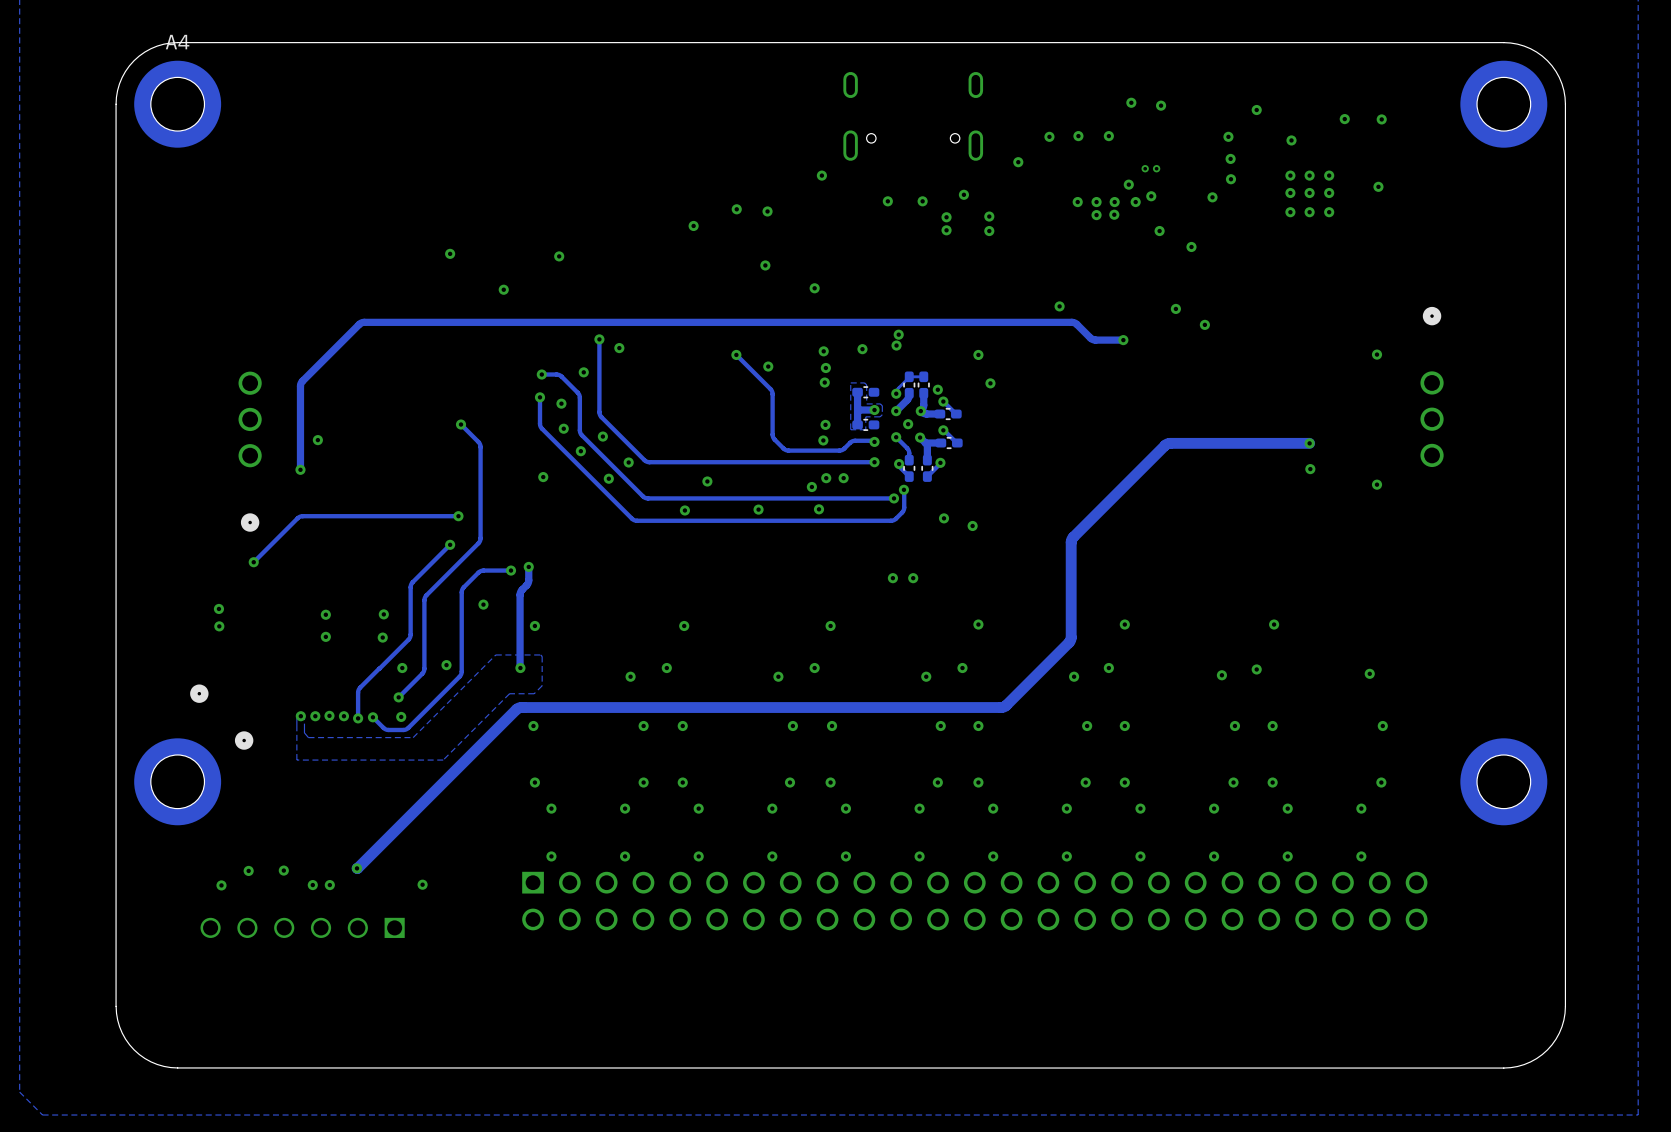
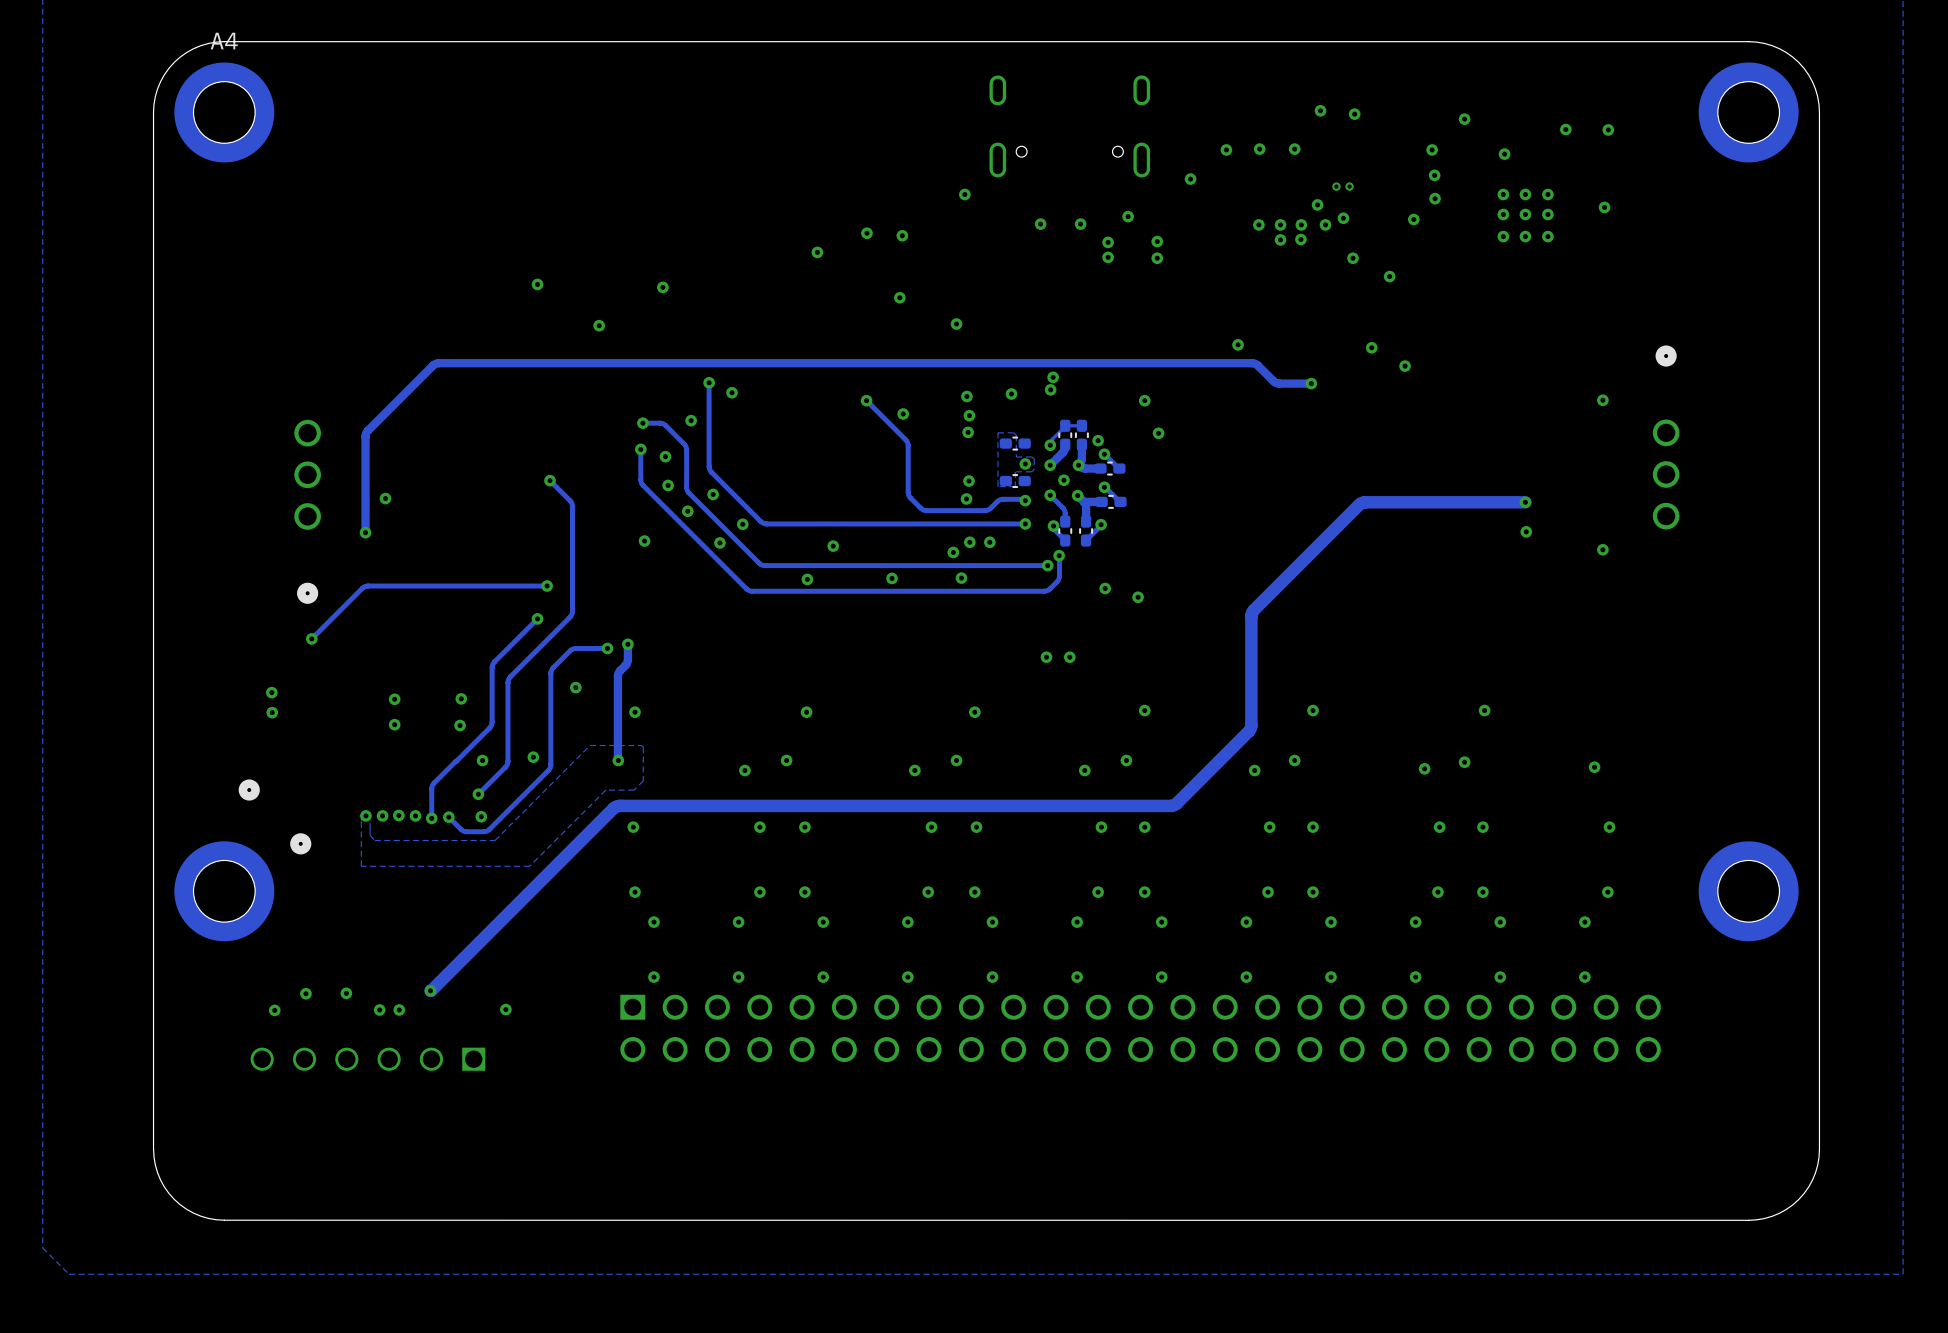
track: (857, 392) (857, 424) -> none
track: (874, 410) (859, 410) -> none

